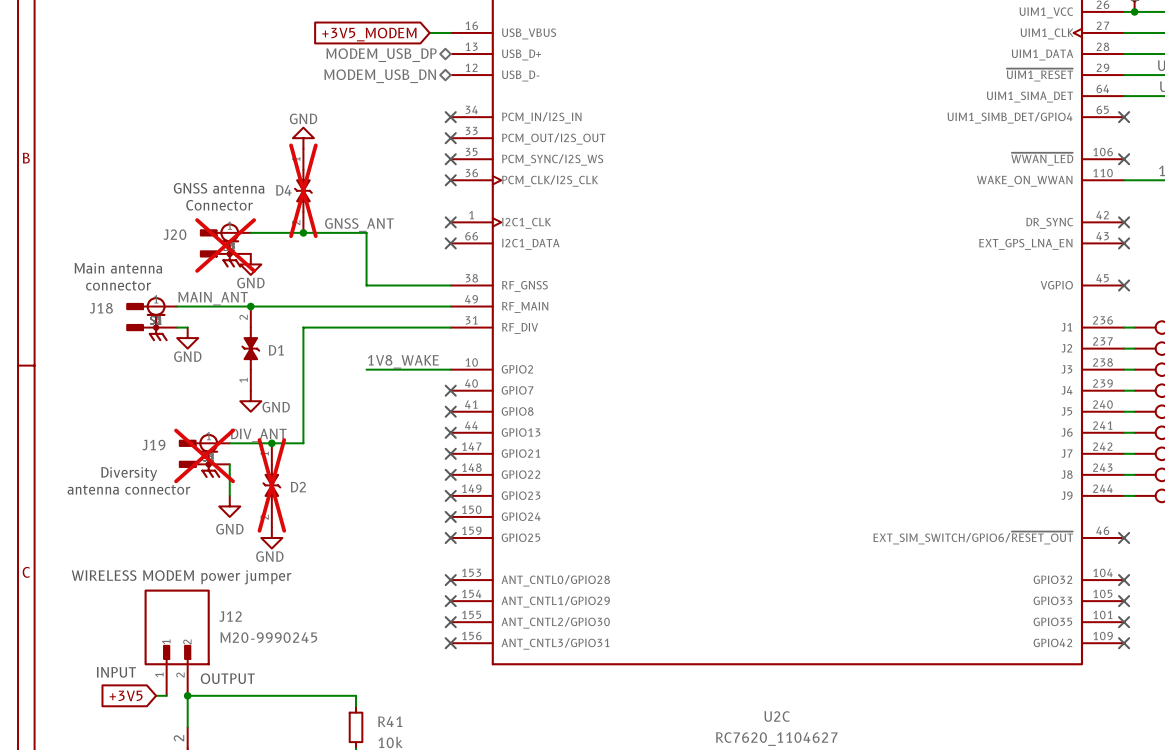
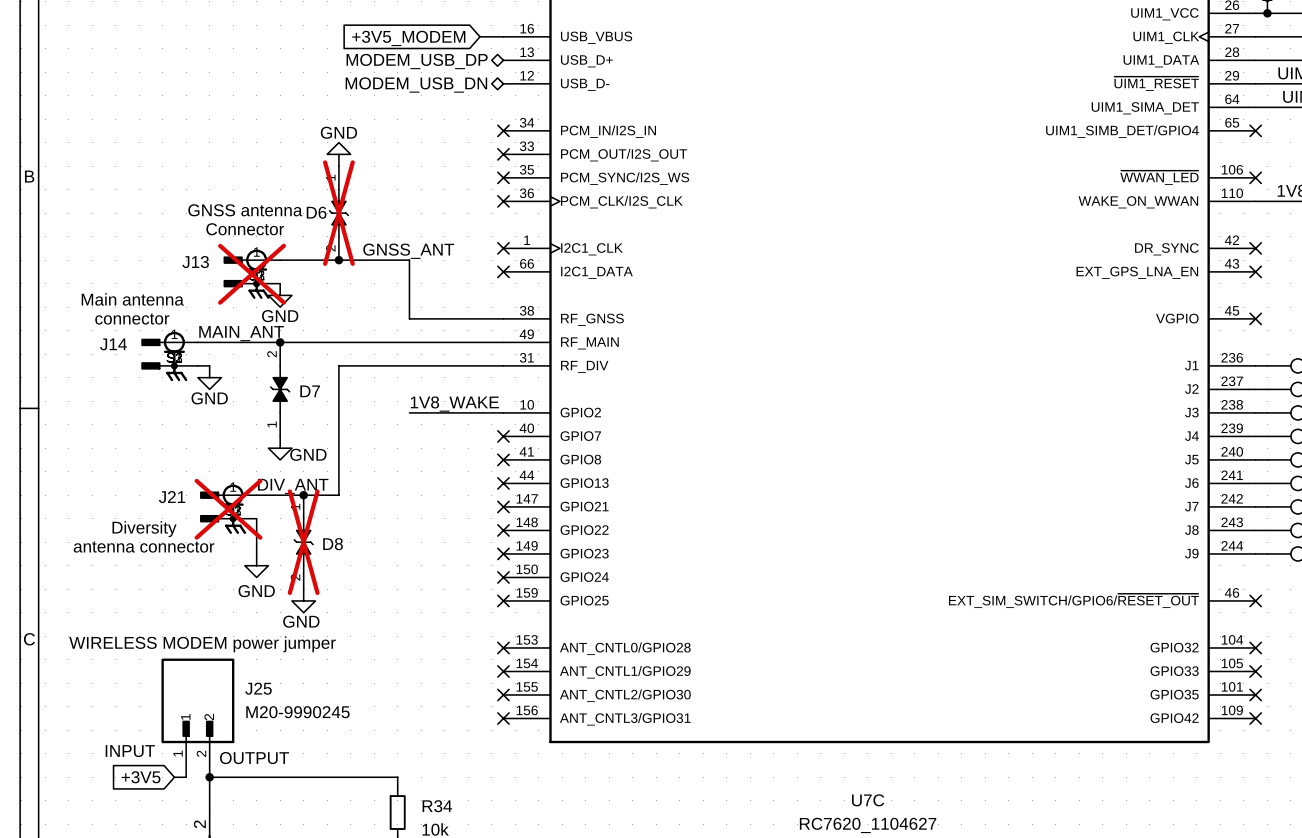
D4 name: D4 (283, 190) -> D6 (316, 212)
J20 name: J20 (174, 234) -> J13 (195, 262)
J18 name: J18 (101, 308) -> J14 (113, 344)
D1 name: D1 (276, 350) -> D7 (310, 391)
J19 name: J19 (153, 445) -> J21 (172, 497)
D2 name: D2 (298, 487) -> D8 (333, 544)
J12 name: J12 (230, 616) -> J25 (258, 688)
U2C name: U2C (777, 716) -> U7C (868, 800)
R41 name: R41 (390, 721) -> R34 (437, 806)

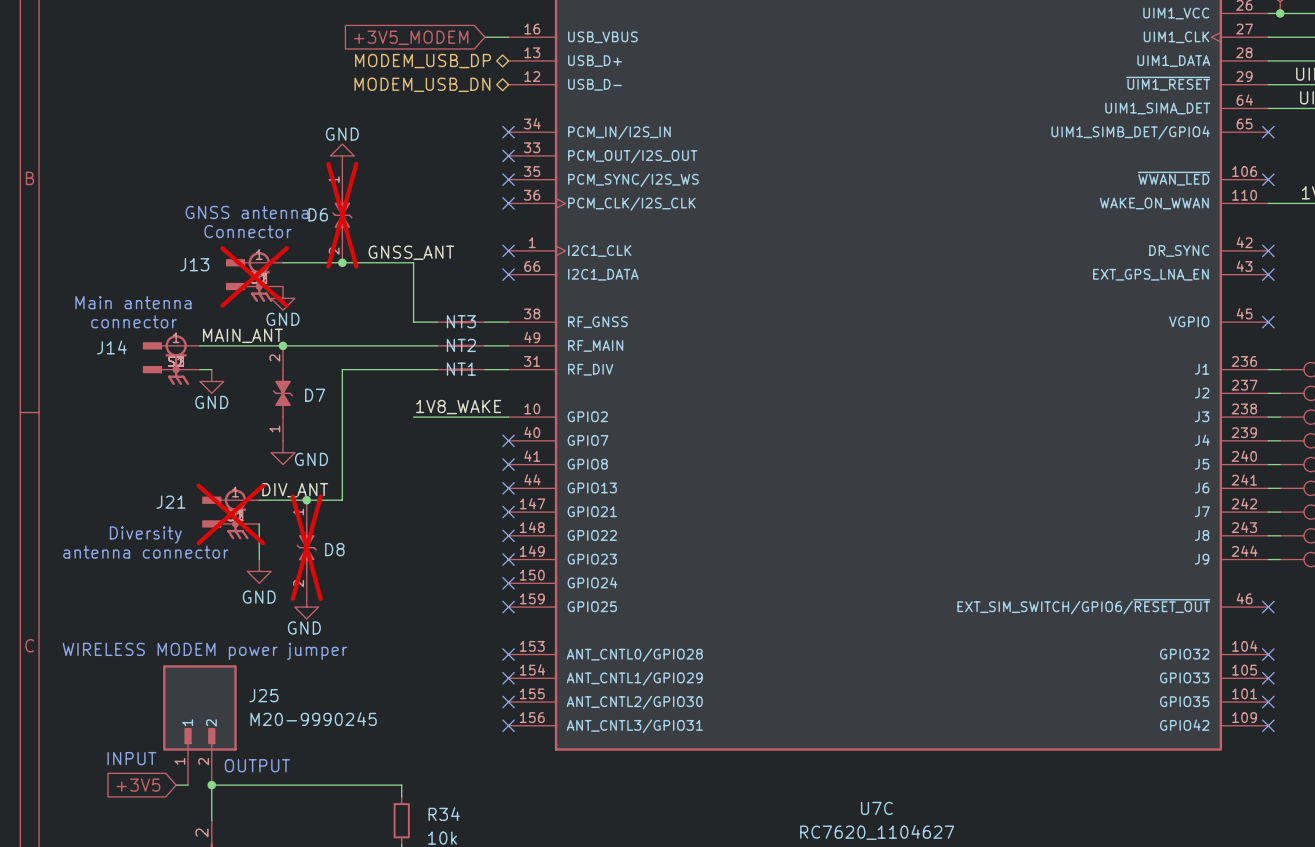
NT3: none -> (461, 322)
NT2: none -> (461, 345)
NT1: none -> (461, 369)

